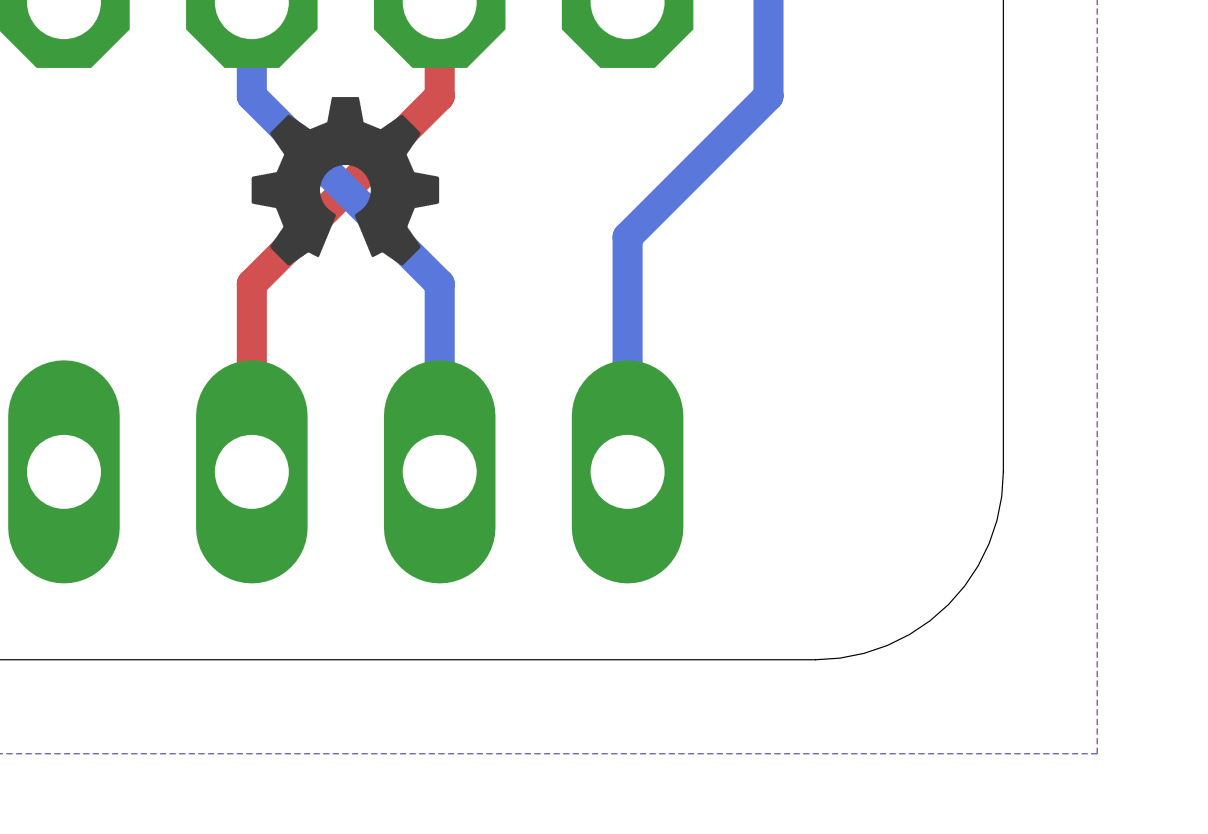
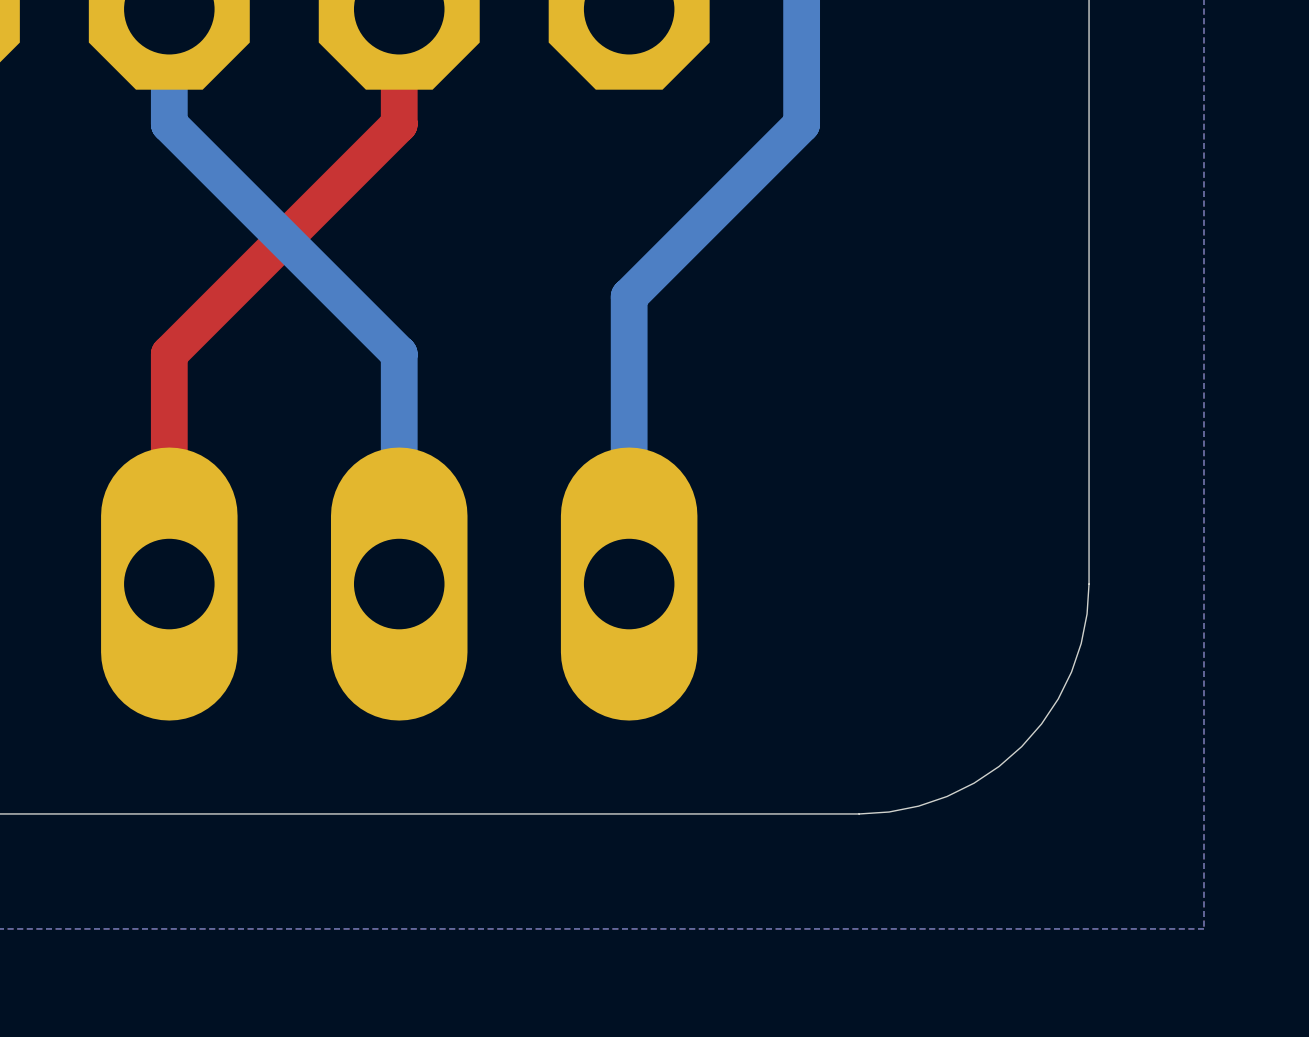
drawing: [251, 97, 440, 266] -> none

